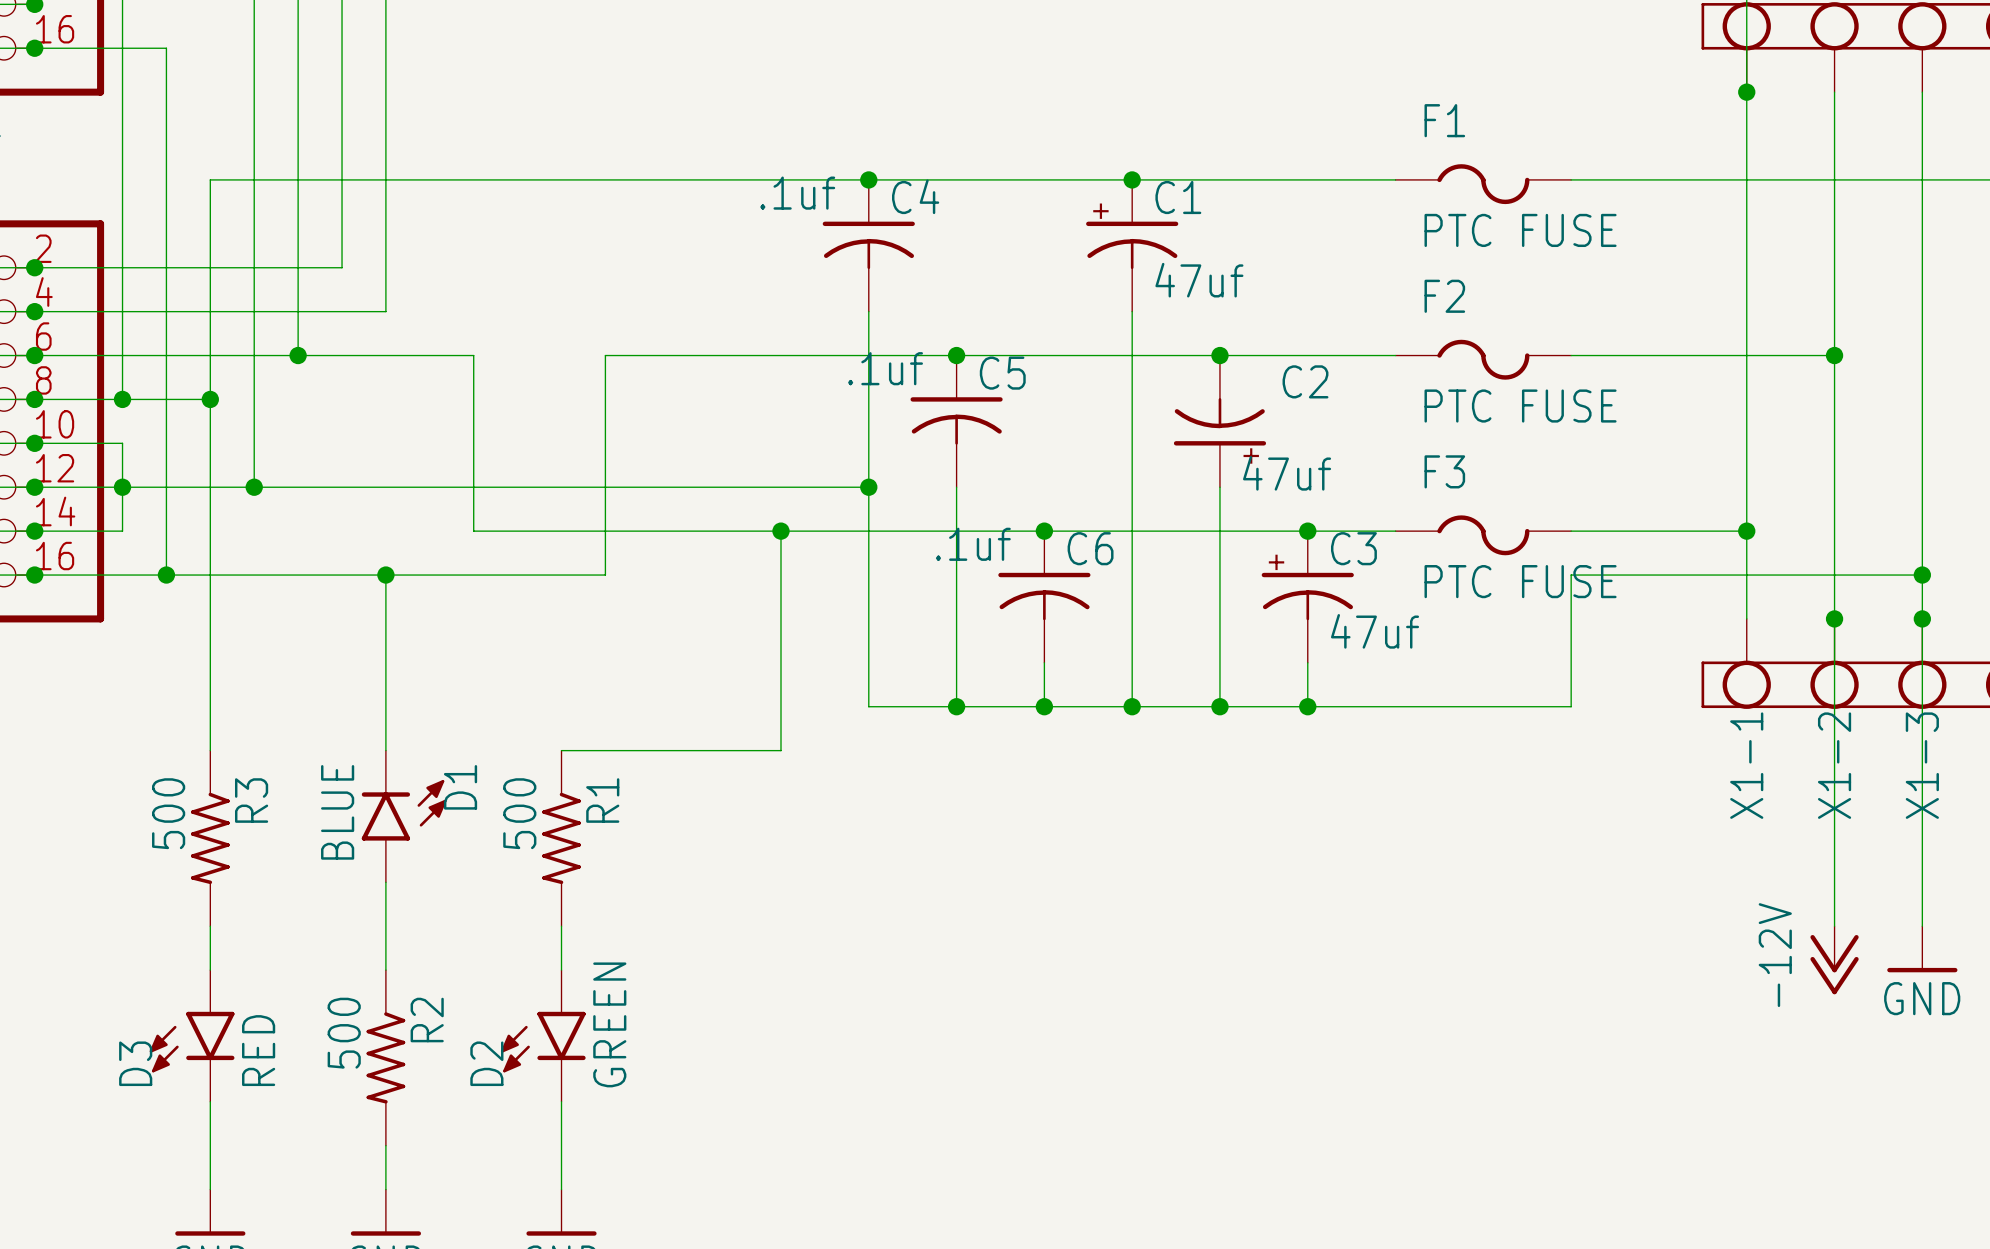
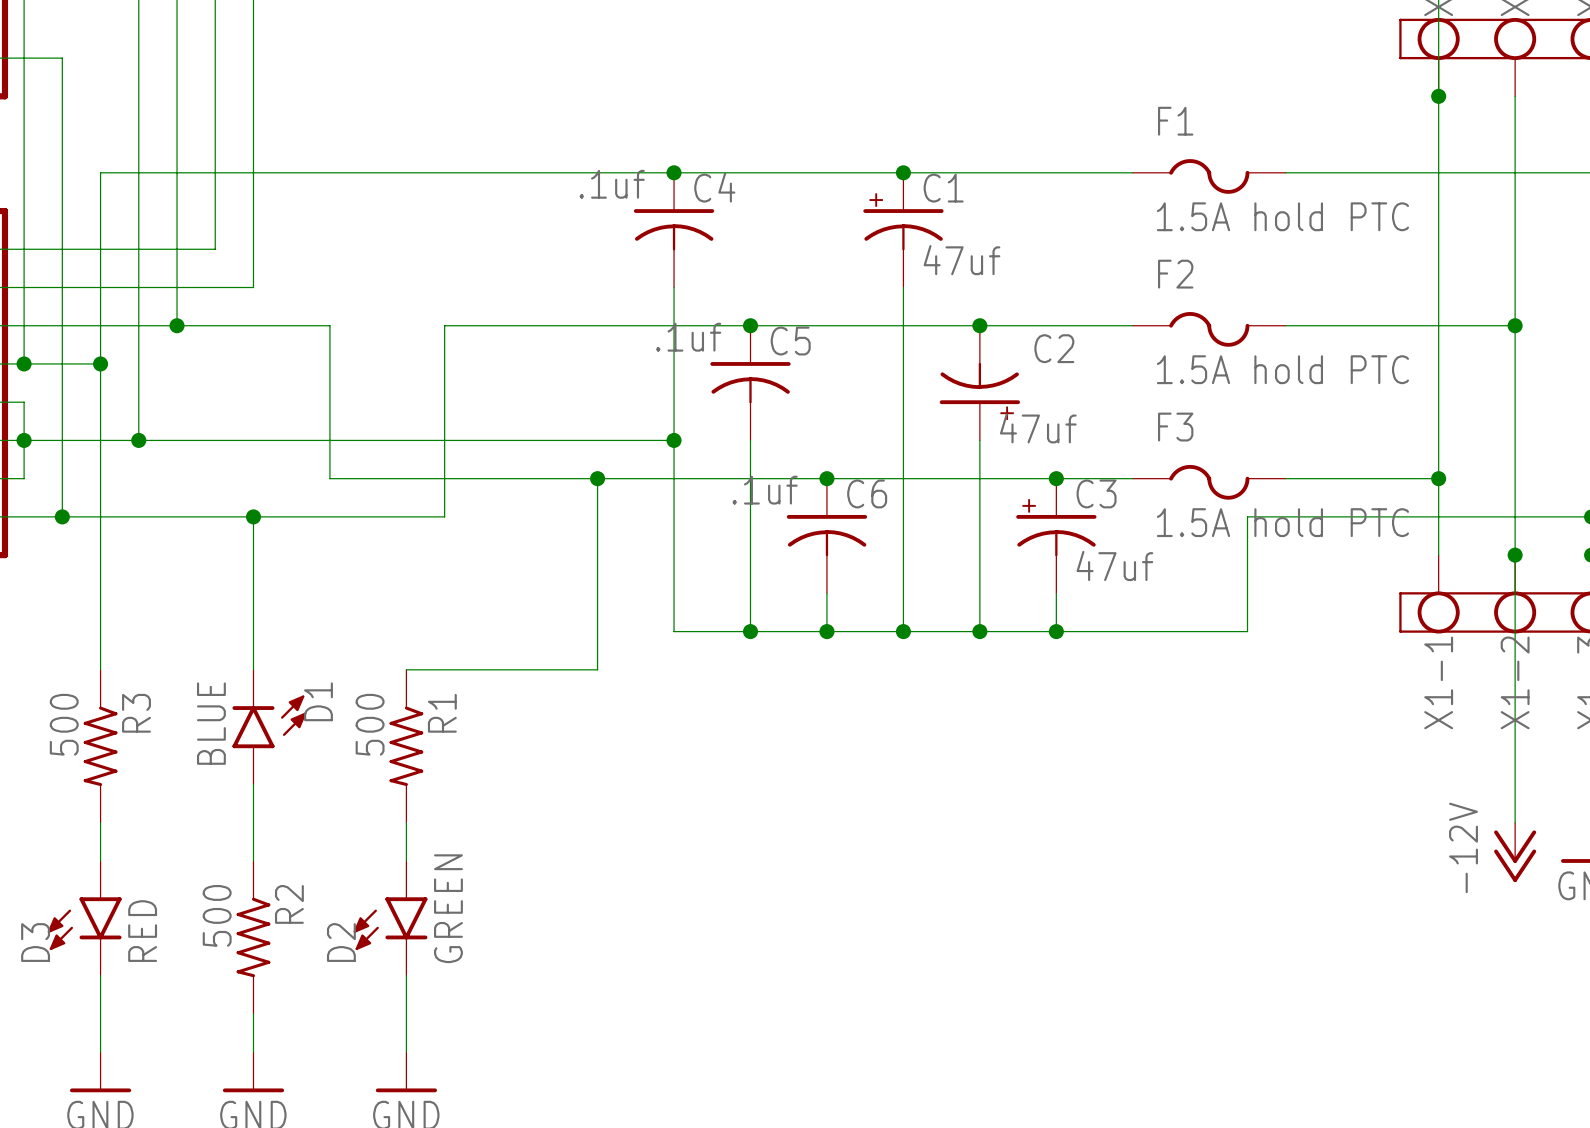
F1 value: PTC FUSE (1520, 230) -> 1.5A hold PTC (1282, 216)
F2 value: PTC FUSE (1520, 406) -> 1.5A hold PTC (1282, 369)
wire: (1571, 575) (1571, 706) (1527, 706) -> (1285, 516) (1247, 516) (1247, 631)
F3 value: PTC FUSE (1520, 581) -> 1.5A hold PTC (1282, 522)

